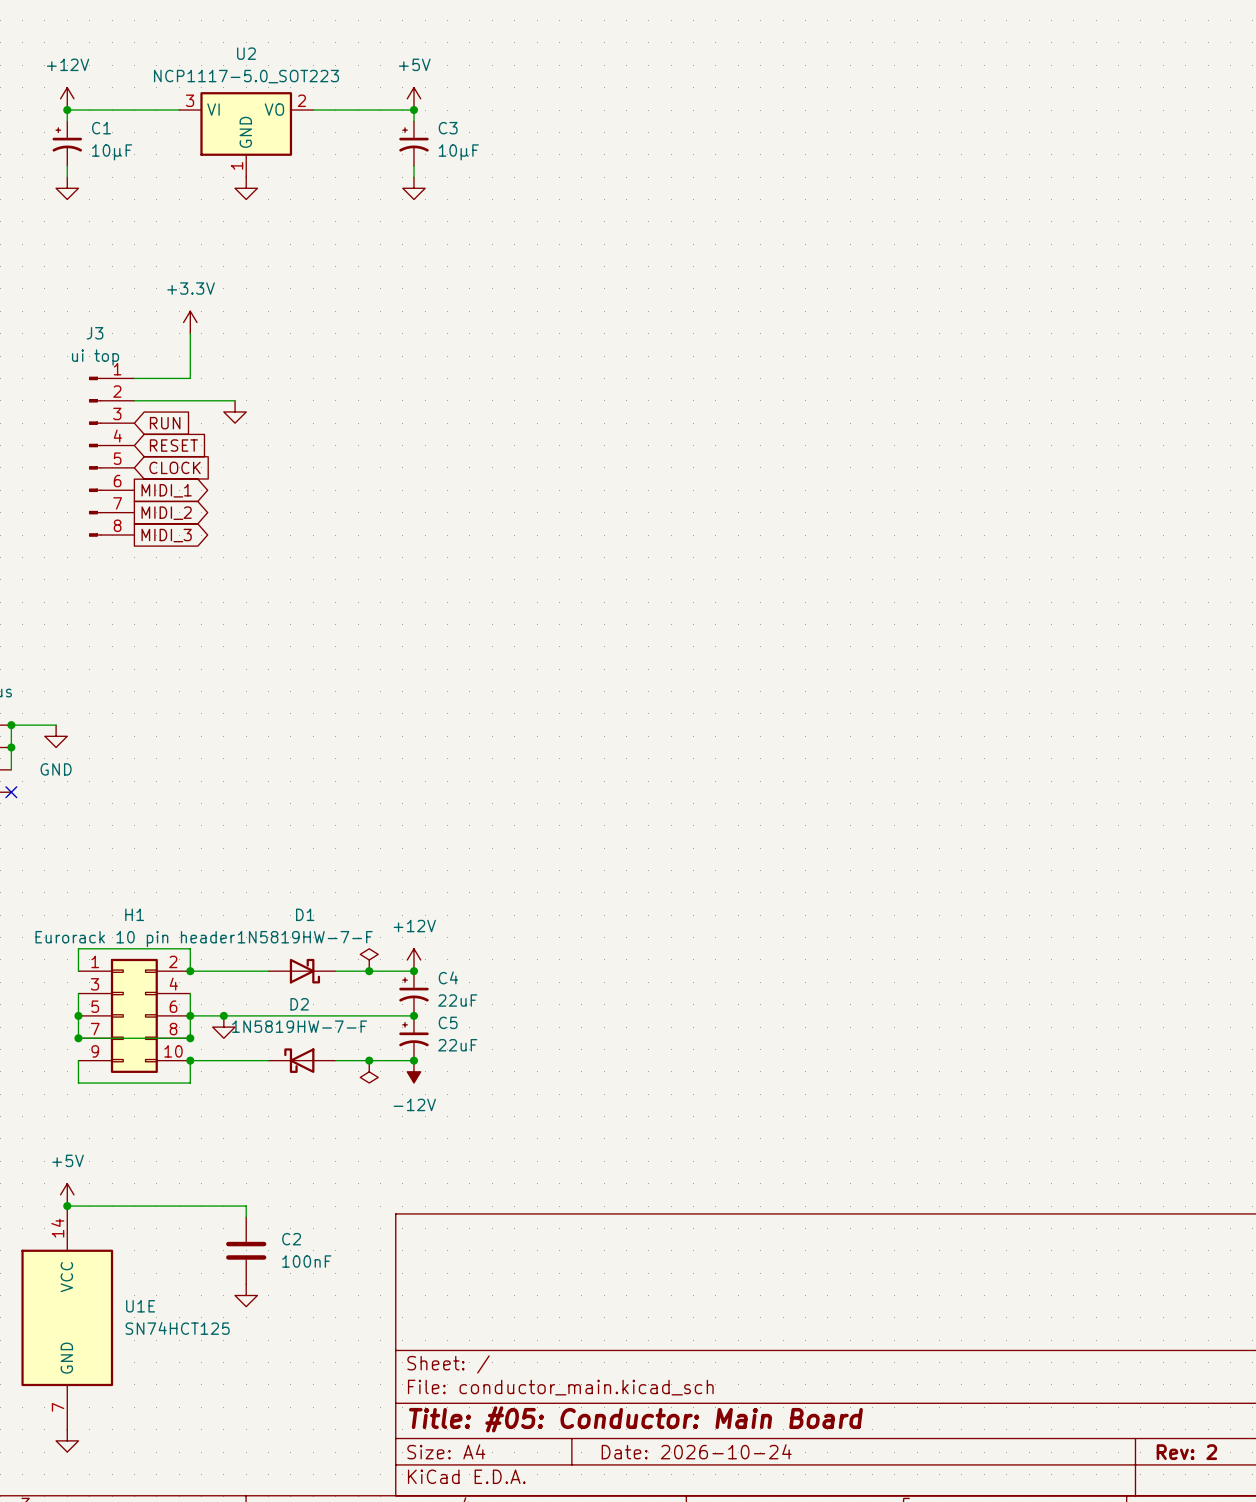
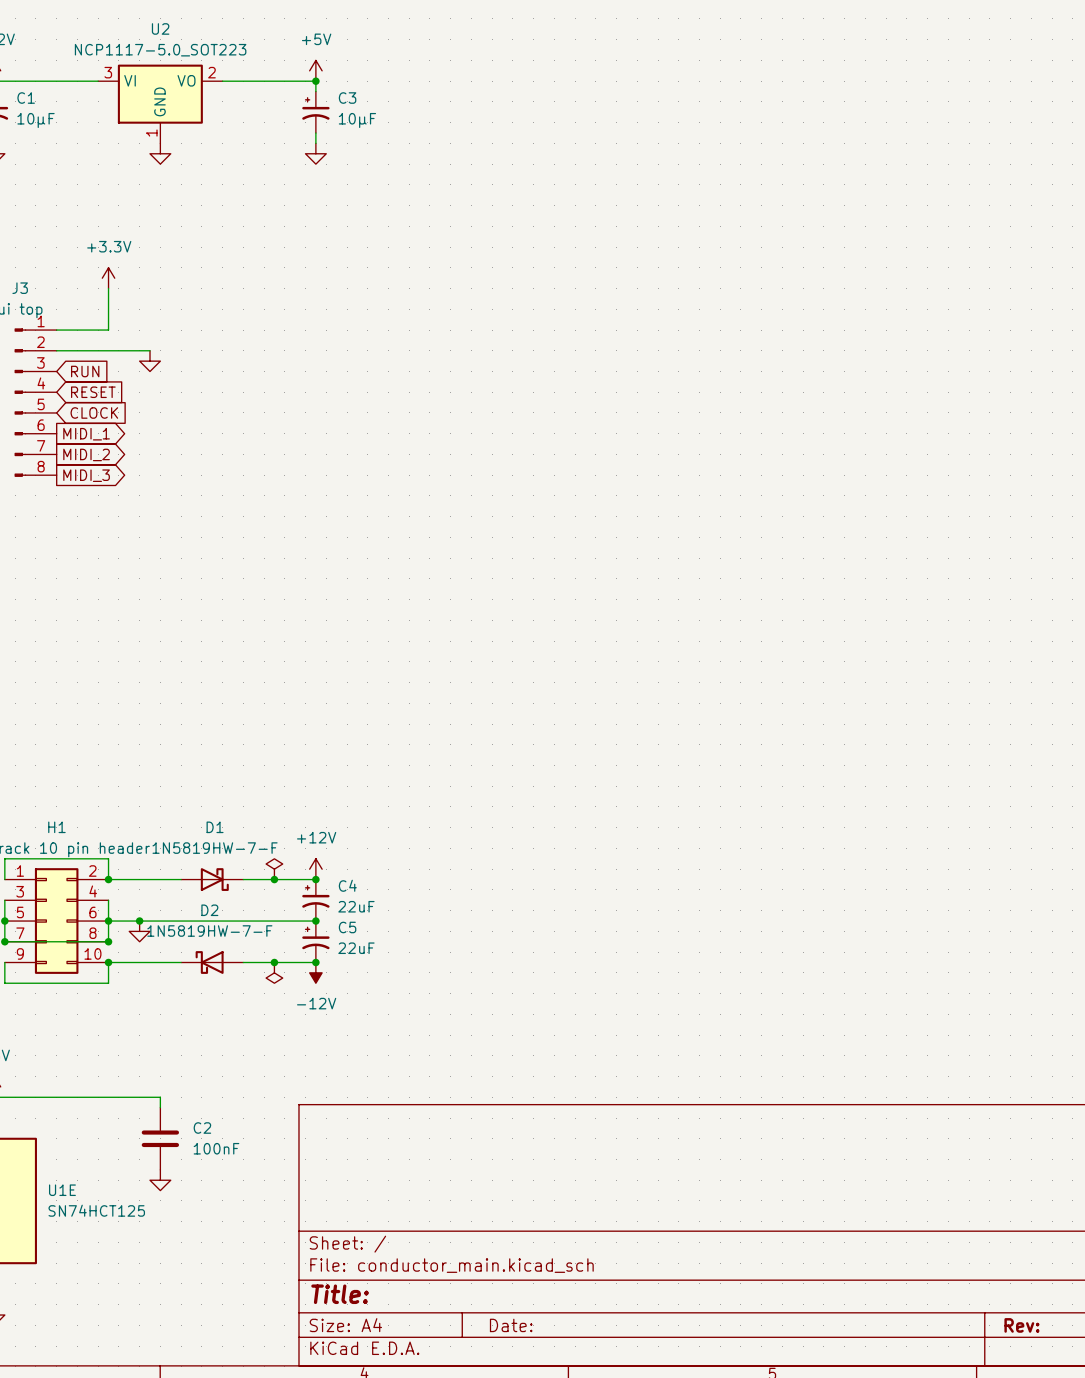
title block: Title: #05: Conductor: Main Board (635, 1419) -> Title: (340, 1294)
title block: Date: 2026-10-24 (696, 1451) -> Date: (511, 1325)
title block: Rev: 2 (1186, 1452) -> Rev: (1021, 1325)

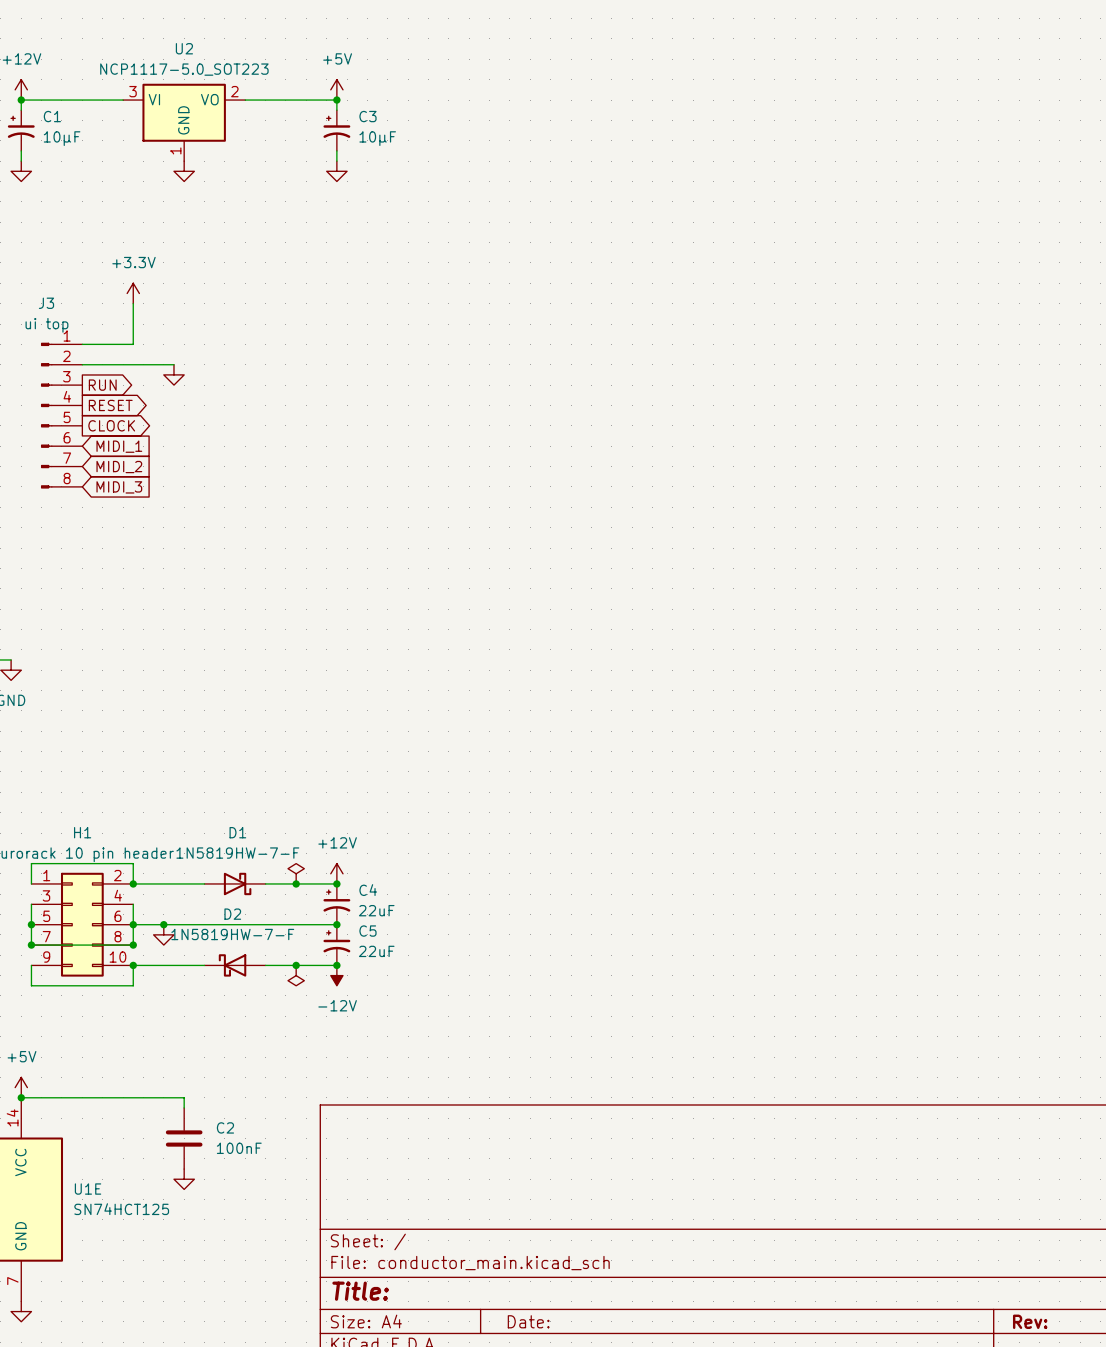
global label shape: input (85, 371) -> output (102, 385)
global label shape: input (93, 392) -> output (110, 405)
global label shape: input (94, 412) -> output (111, 425)
global label shape: output (86, 434) -> input (119, 446)
global label shape: output (86, 454) -> input (119, 467)
global label shape: output (86, 475) -> input (119, 487)

